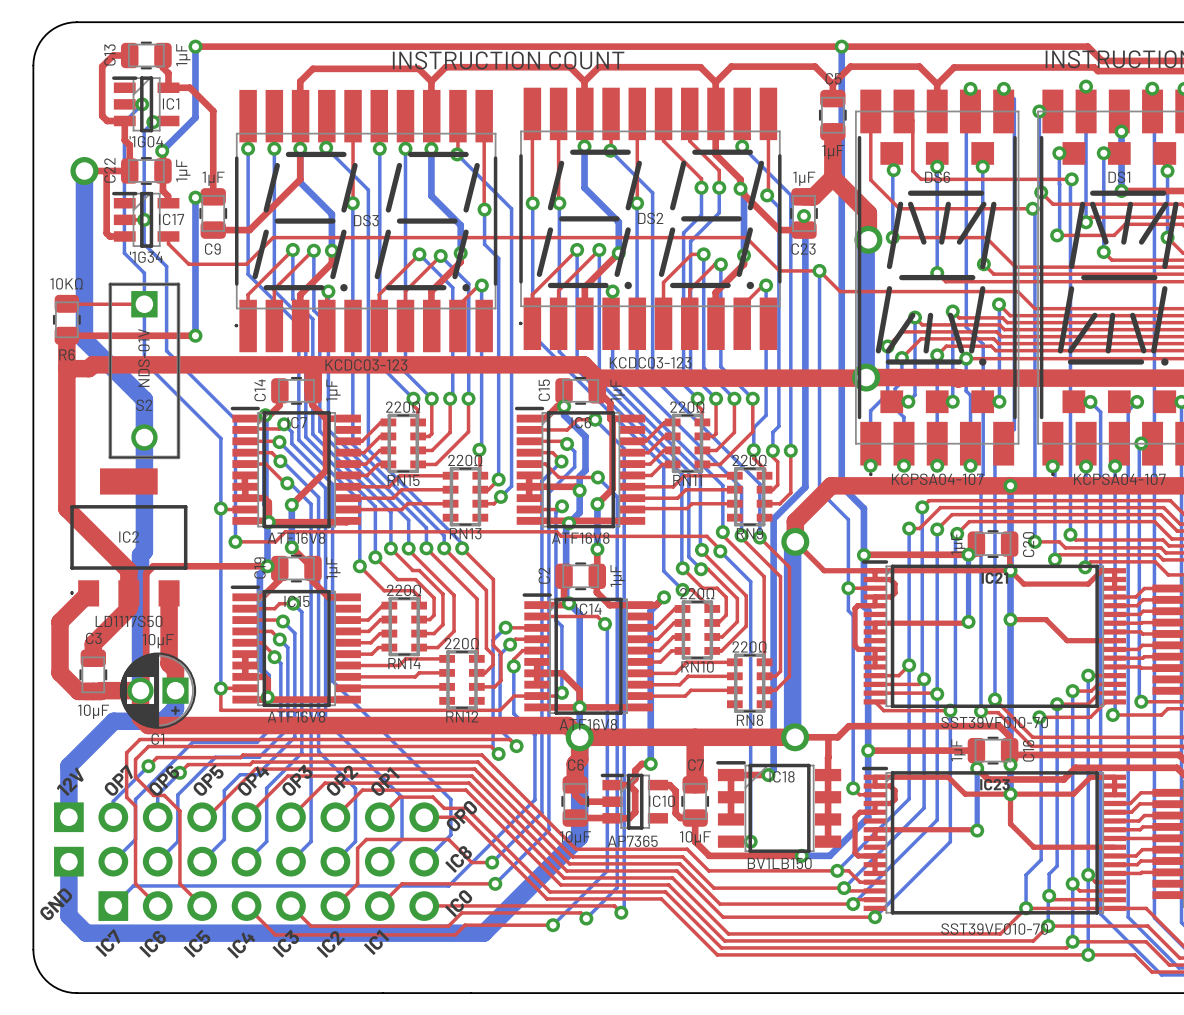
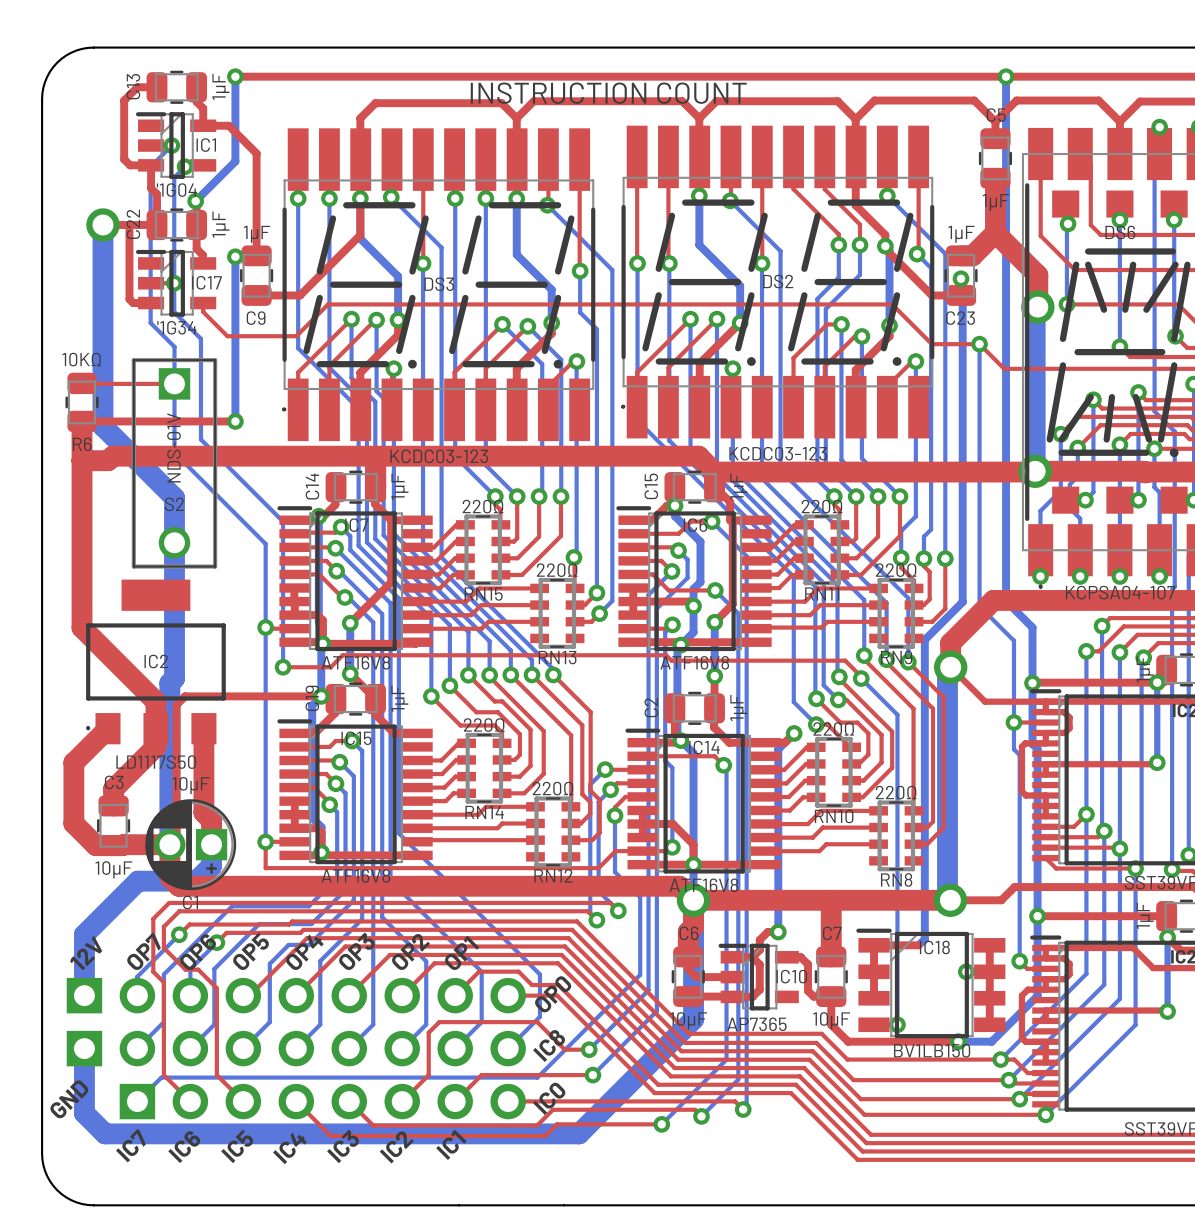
top track: (828, 737) (828, 775) -> none
via position: (768, 775) -> (966, 971)

